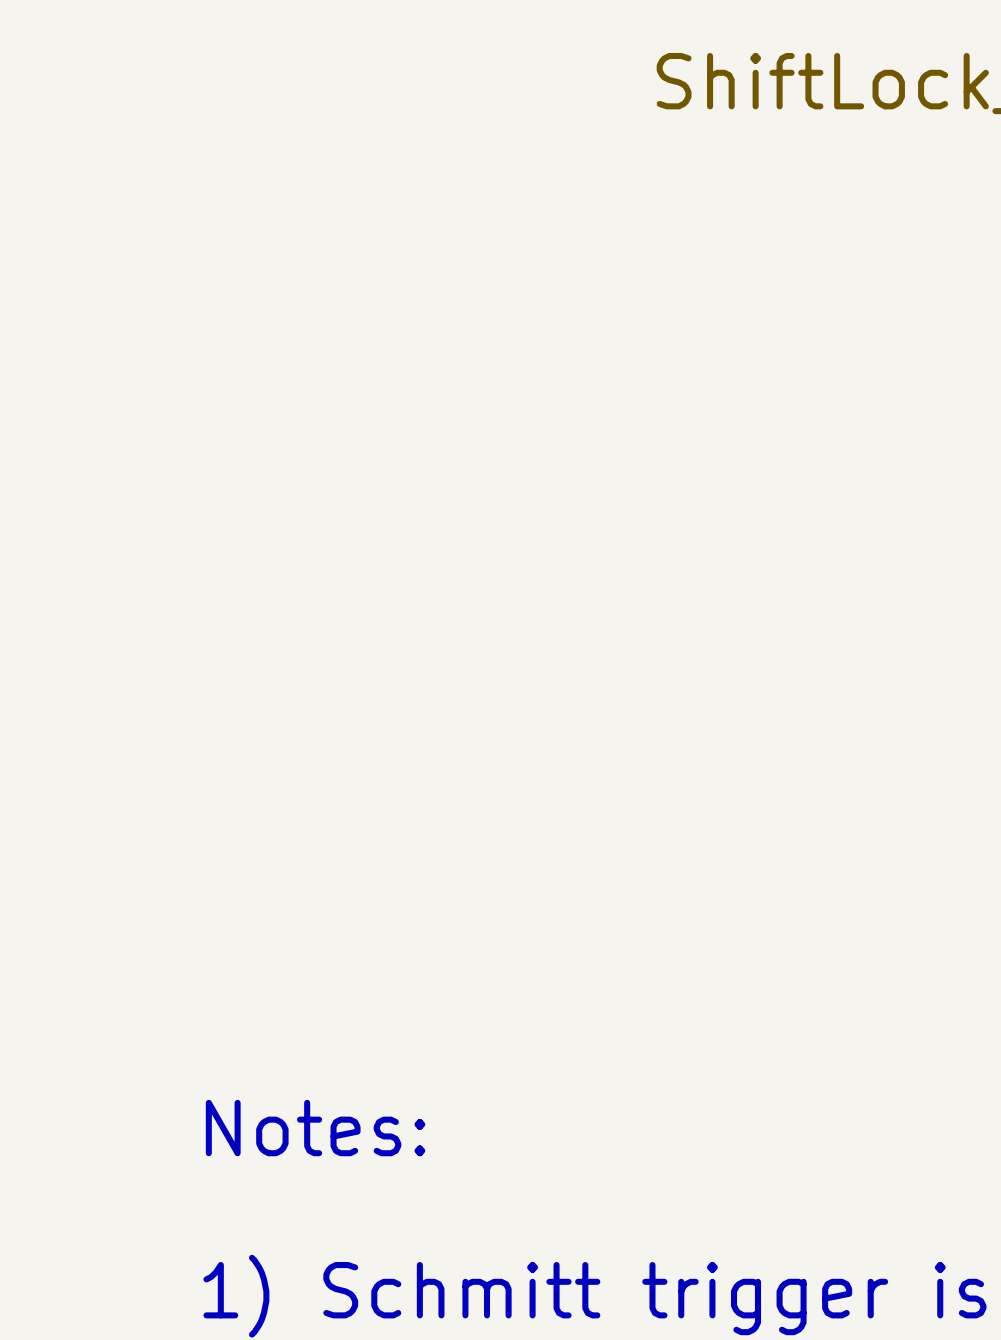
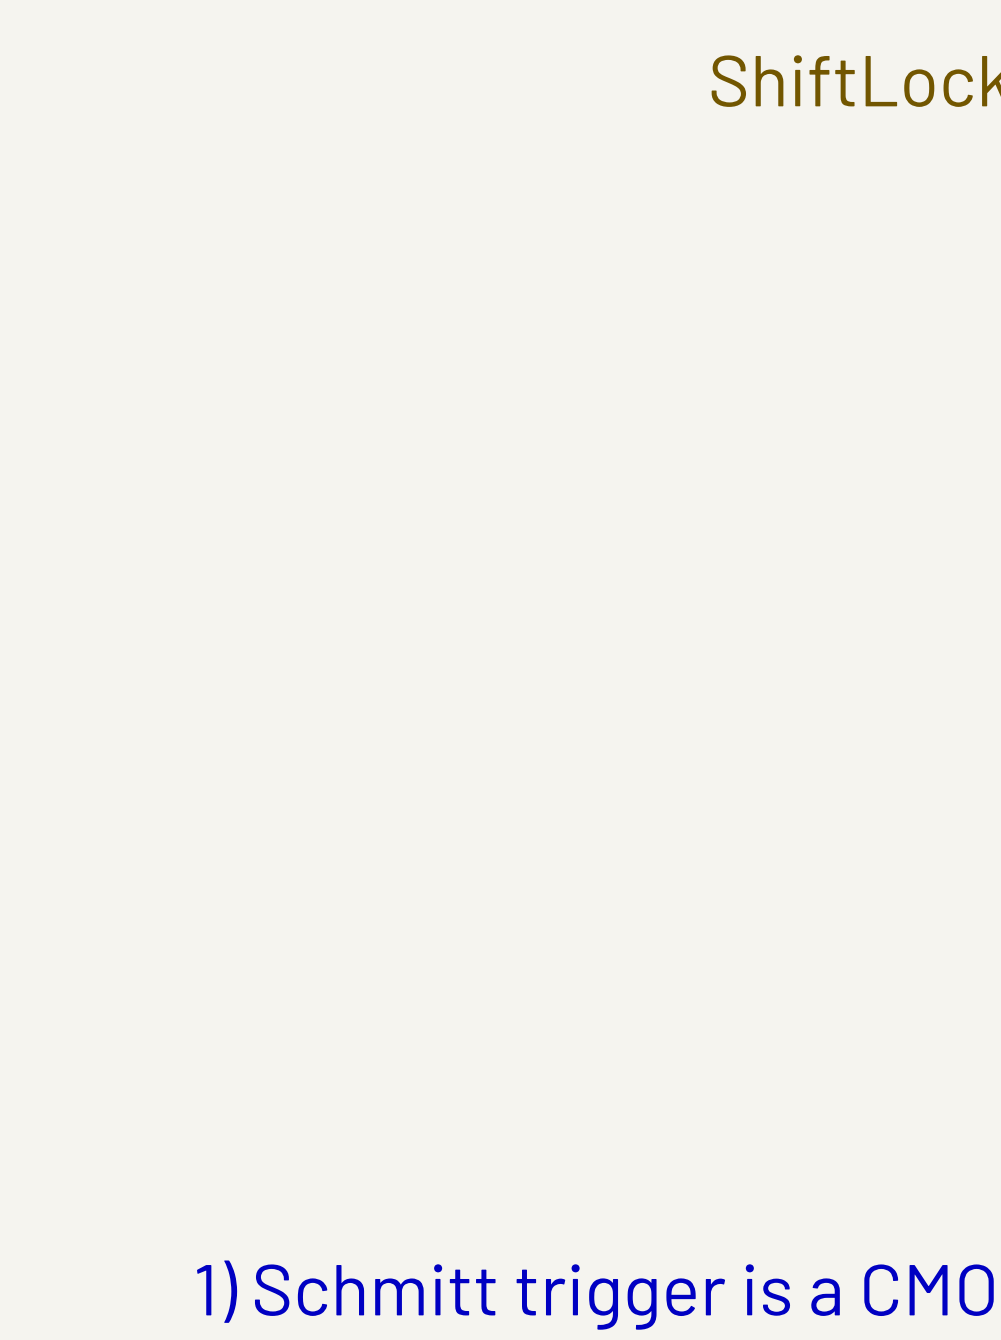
text: Notes: (315, 1128) -> none

